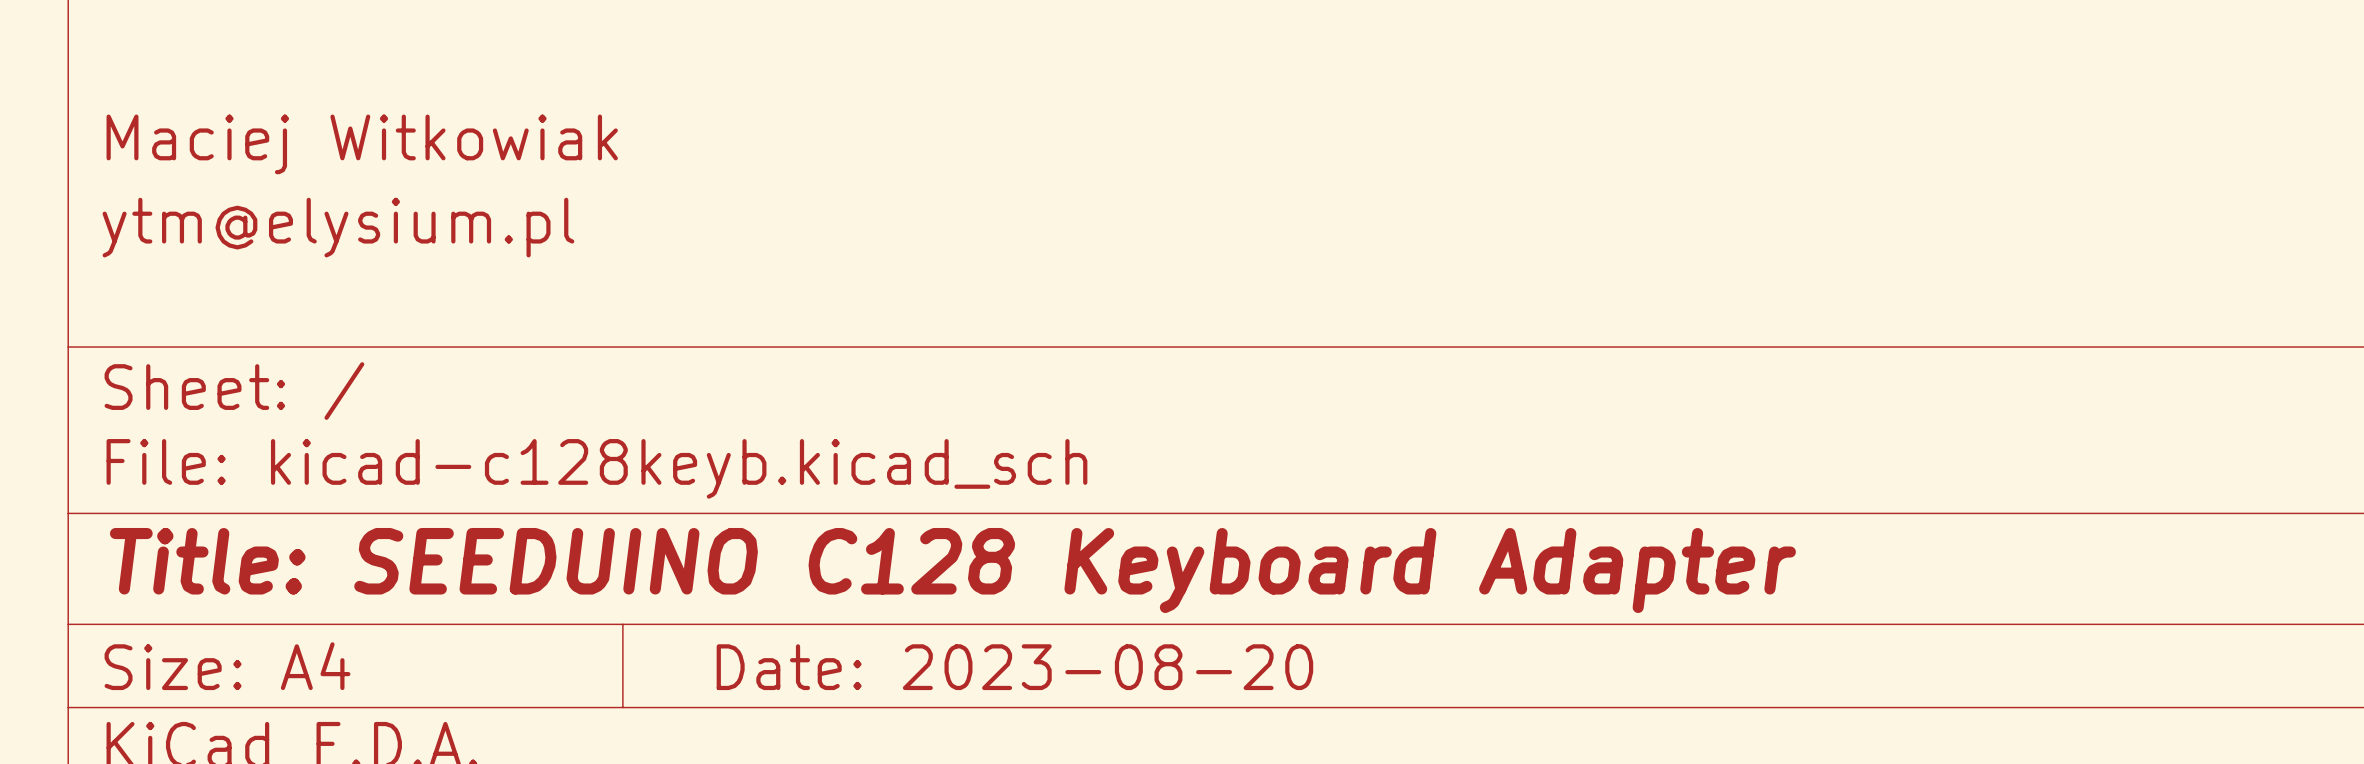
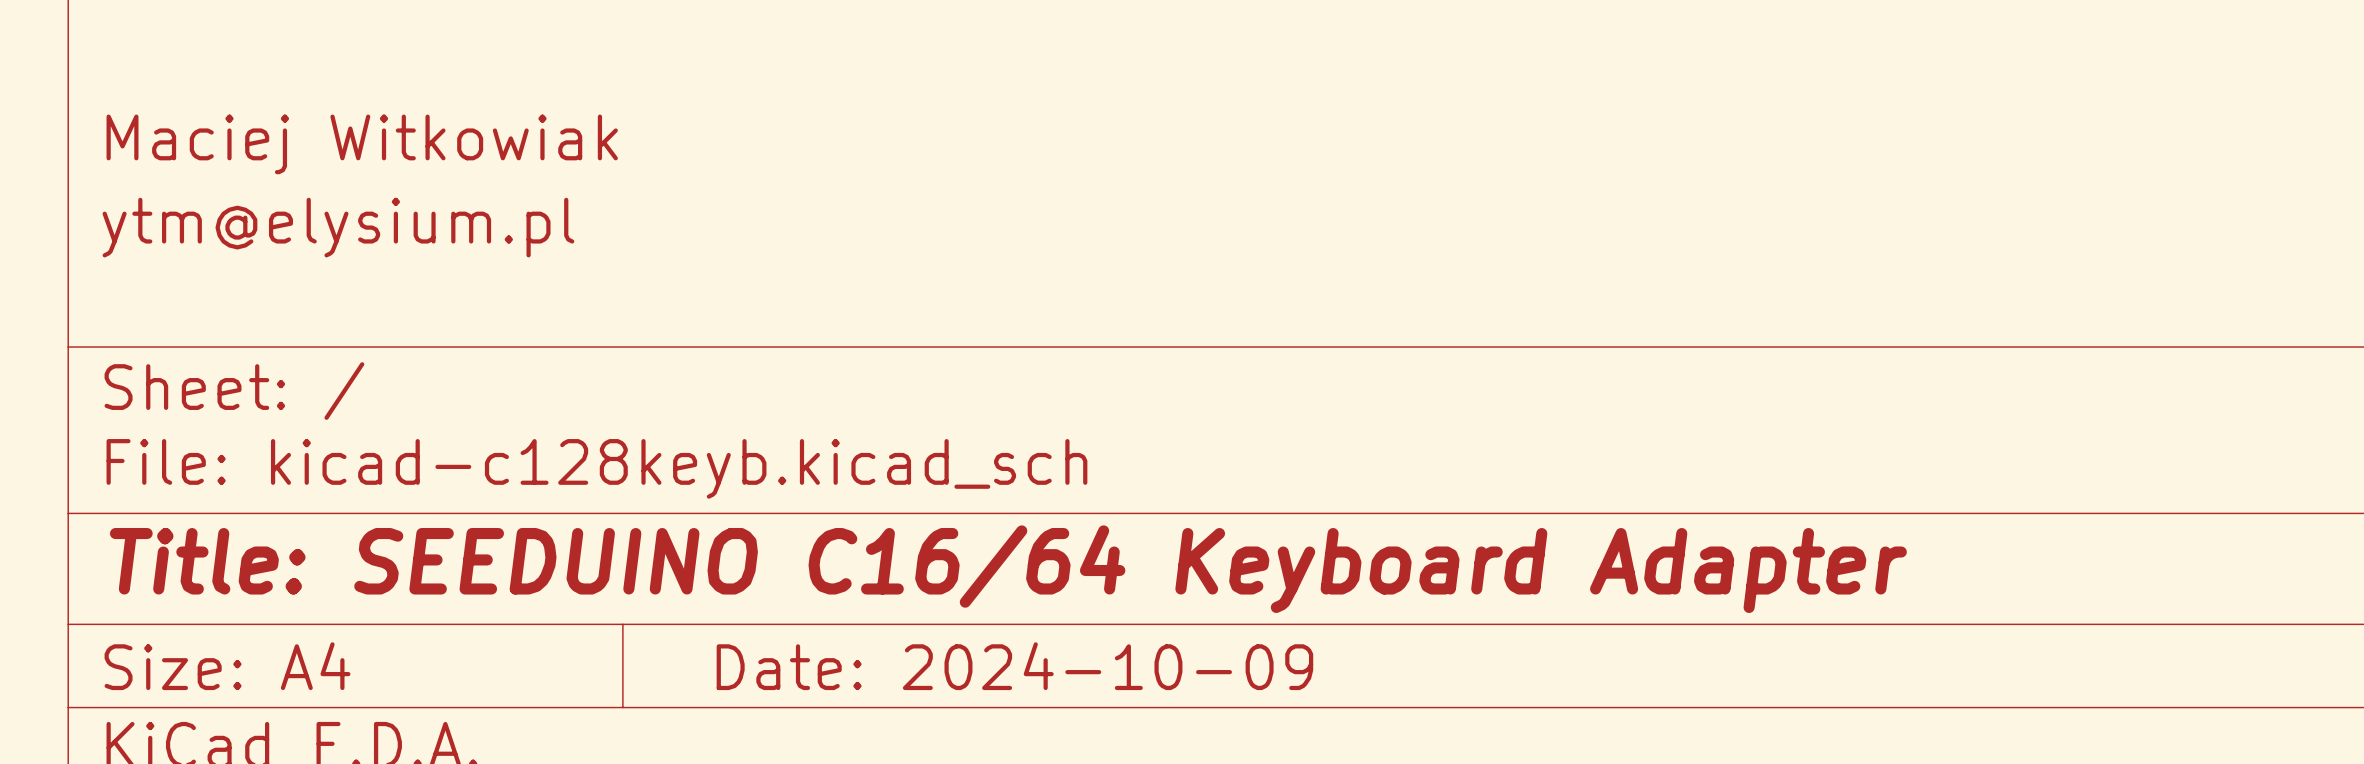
title block: Title: SEEDUINO C128 Keyboard Adapter (952, 570) -> Title: SEEDUINO C16/64 Keyboard Adapter (1008, 569)
title block: Date: 2023-08-20 (1014, 667) -> Date: 2024-10-09 (1014, 666)

